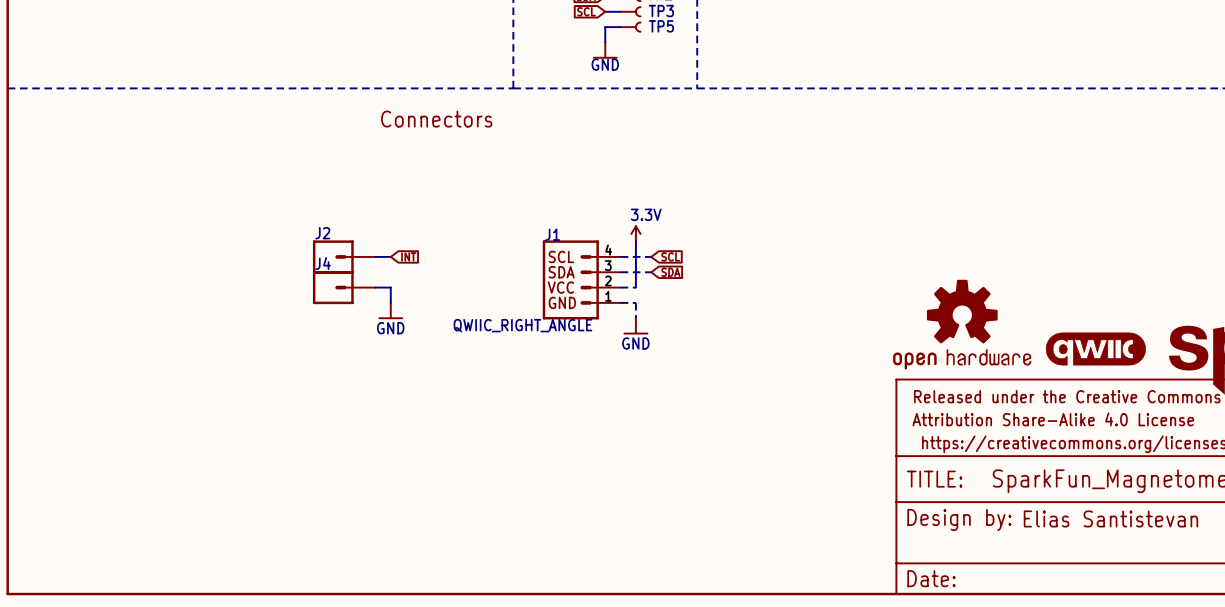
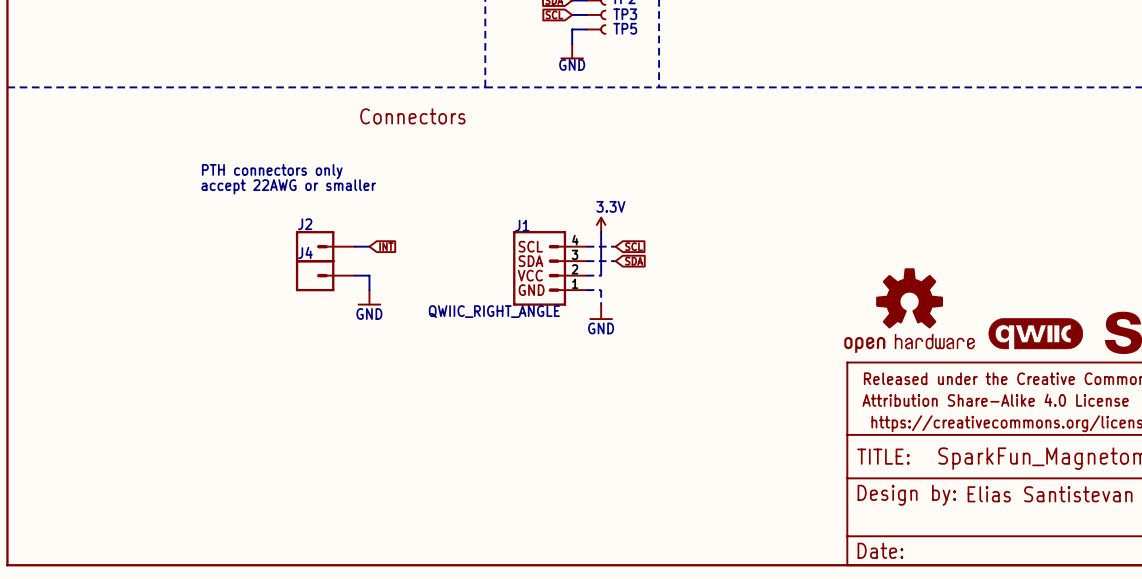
text: none -> PTH connectors only (272, 171)
text: none -> accept 22AWG or smaller (288, 186)

